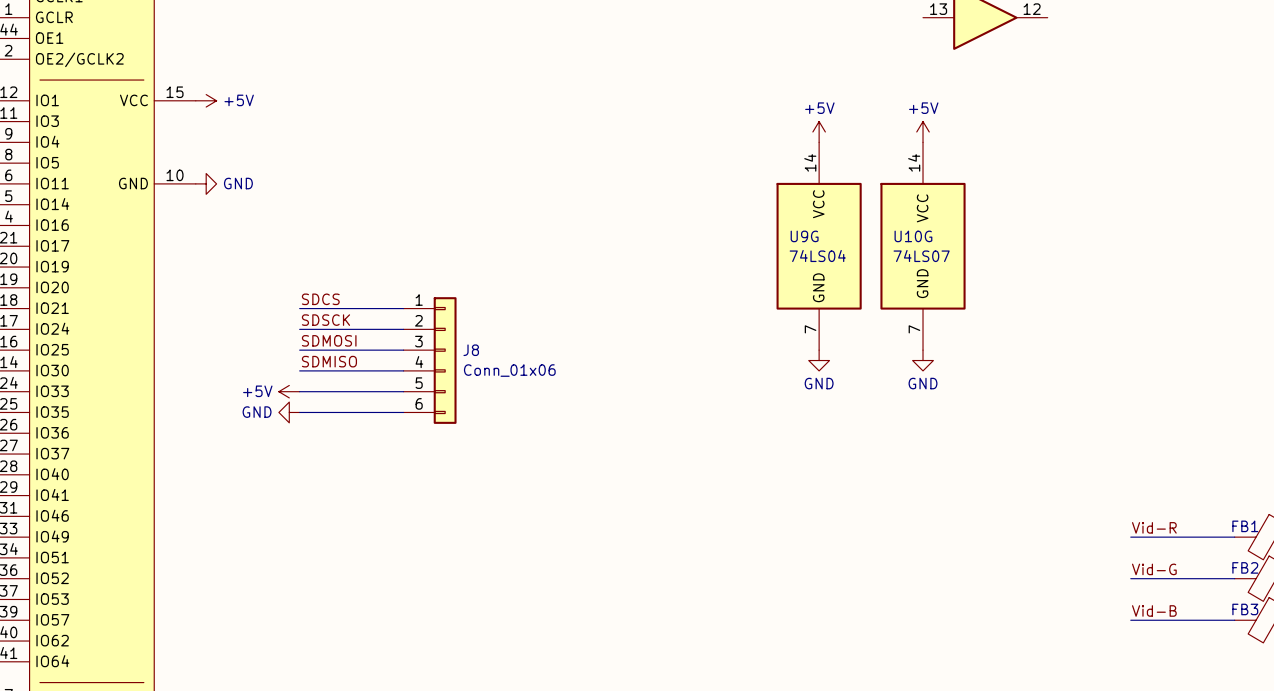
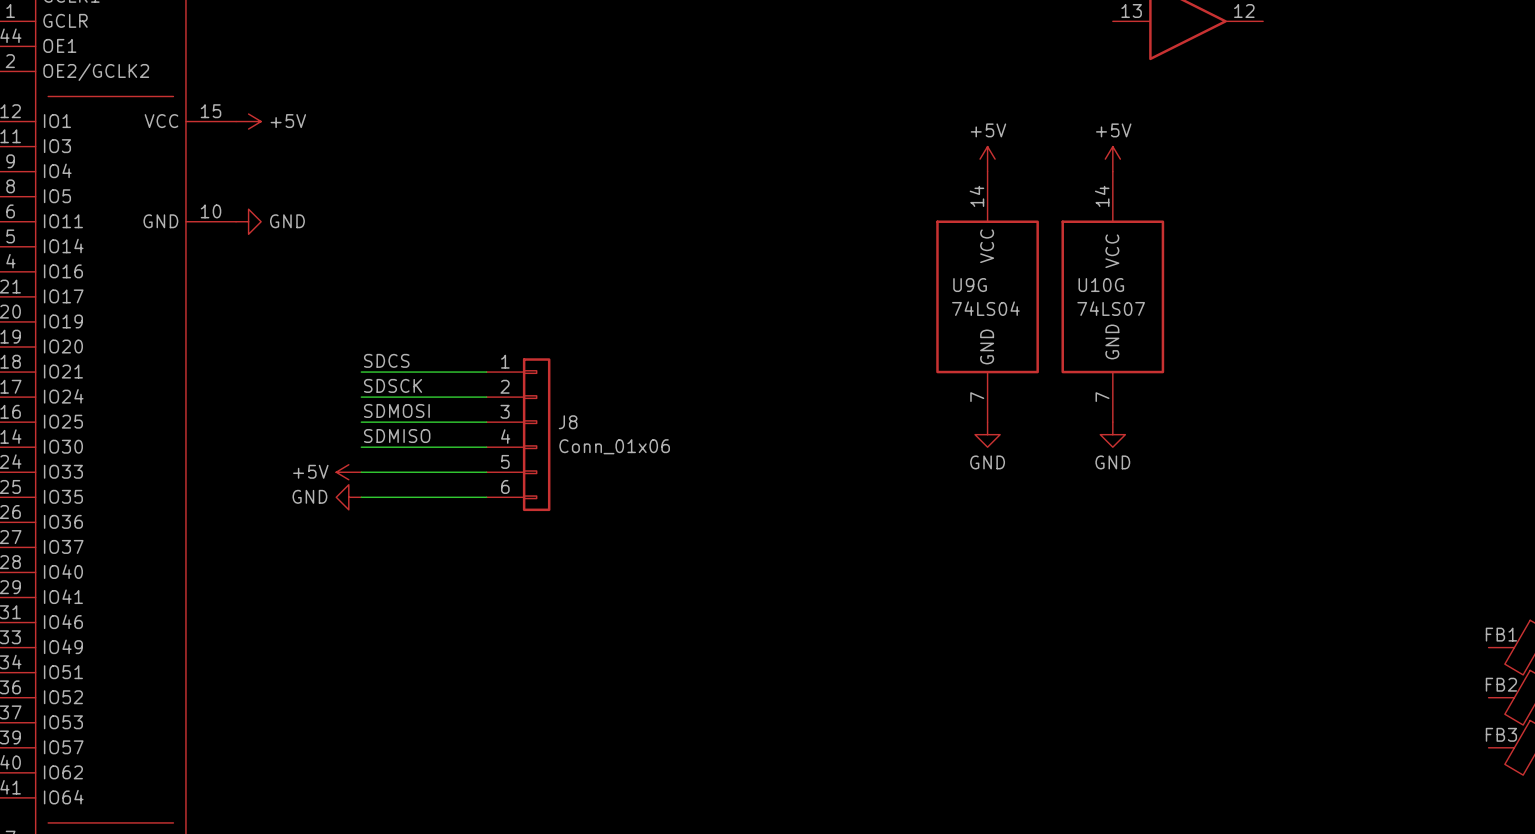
label: Vid-R (1154, 527) -> none
wire: (1130, 537) (1234, 537) -> none
label: Vid-G (1154, 569) -> none
wire: (1130, 578) (1234, 578) -> none
label: Vid-B (1154, 610) -> none
wire: (1130, 620) (1234, 620) -> none

